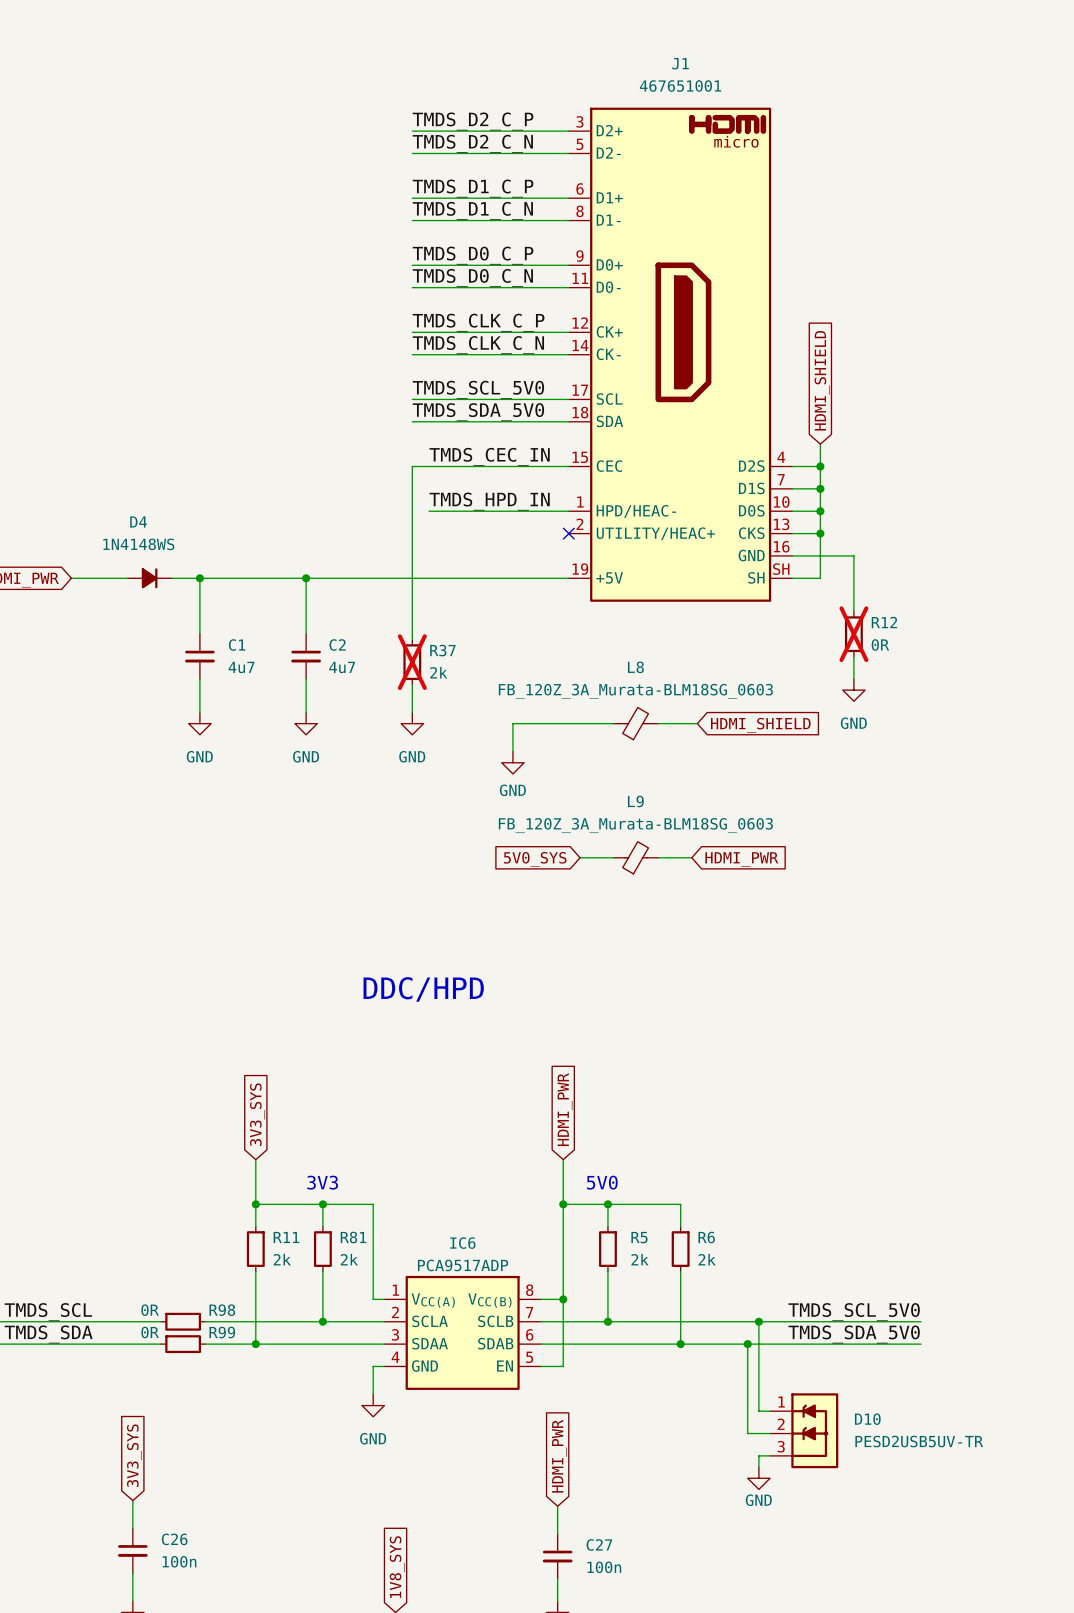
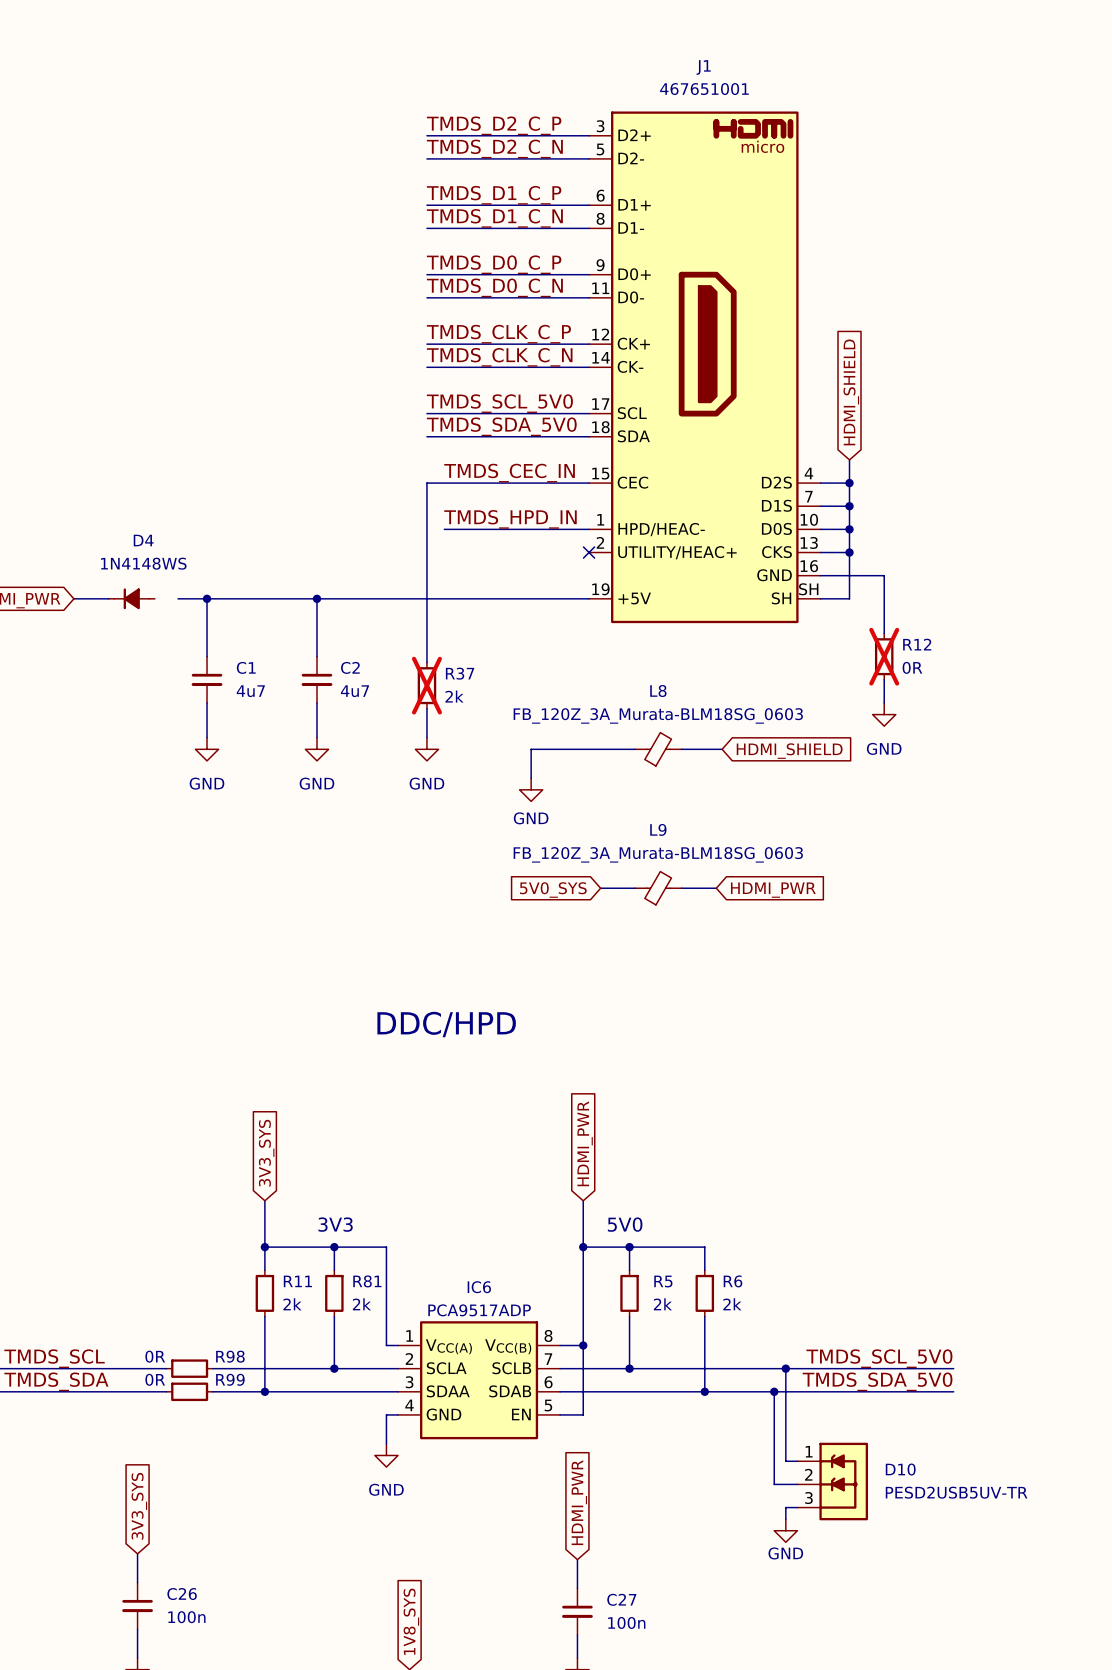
D4 rotation: 0° (149, 578) -> 180° (131, 598)

